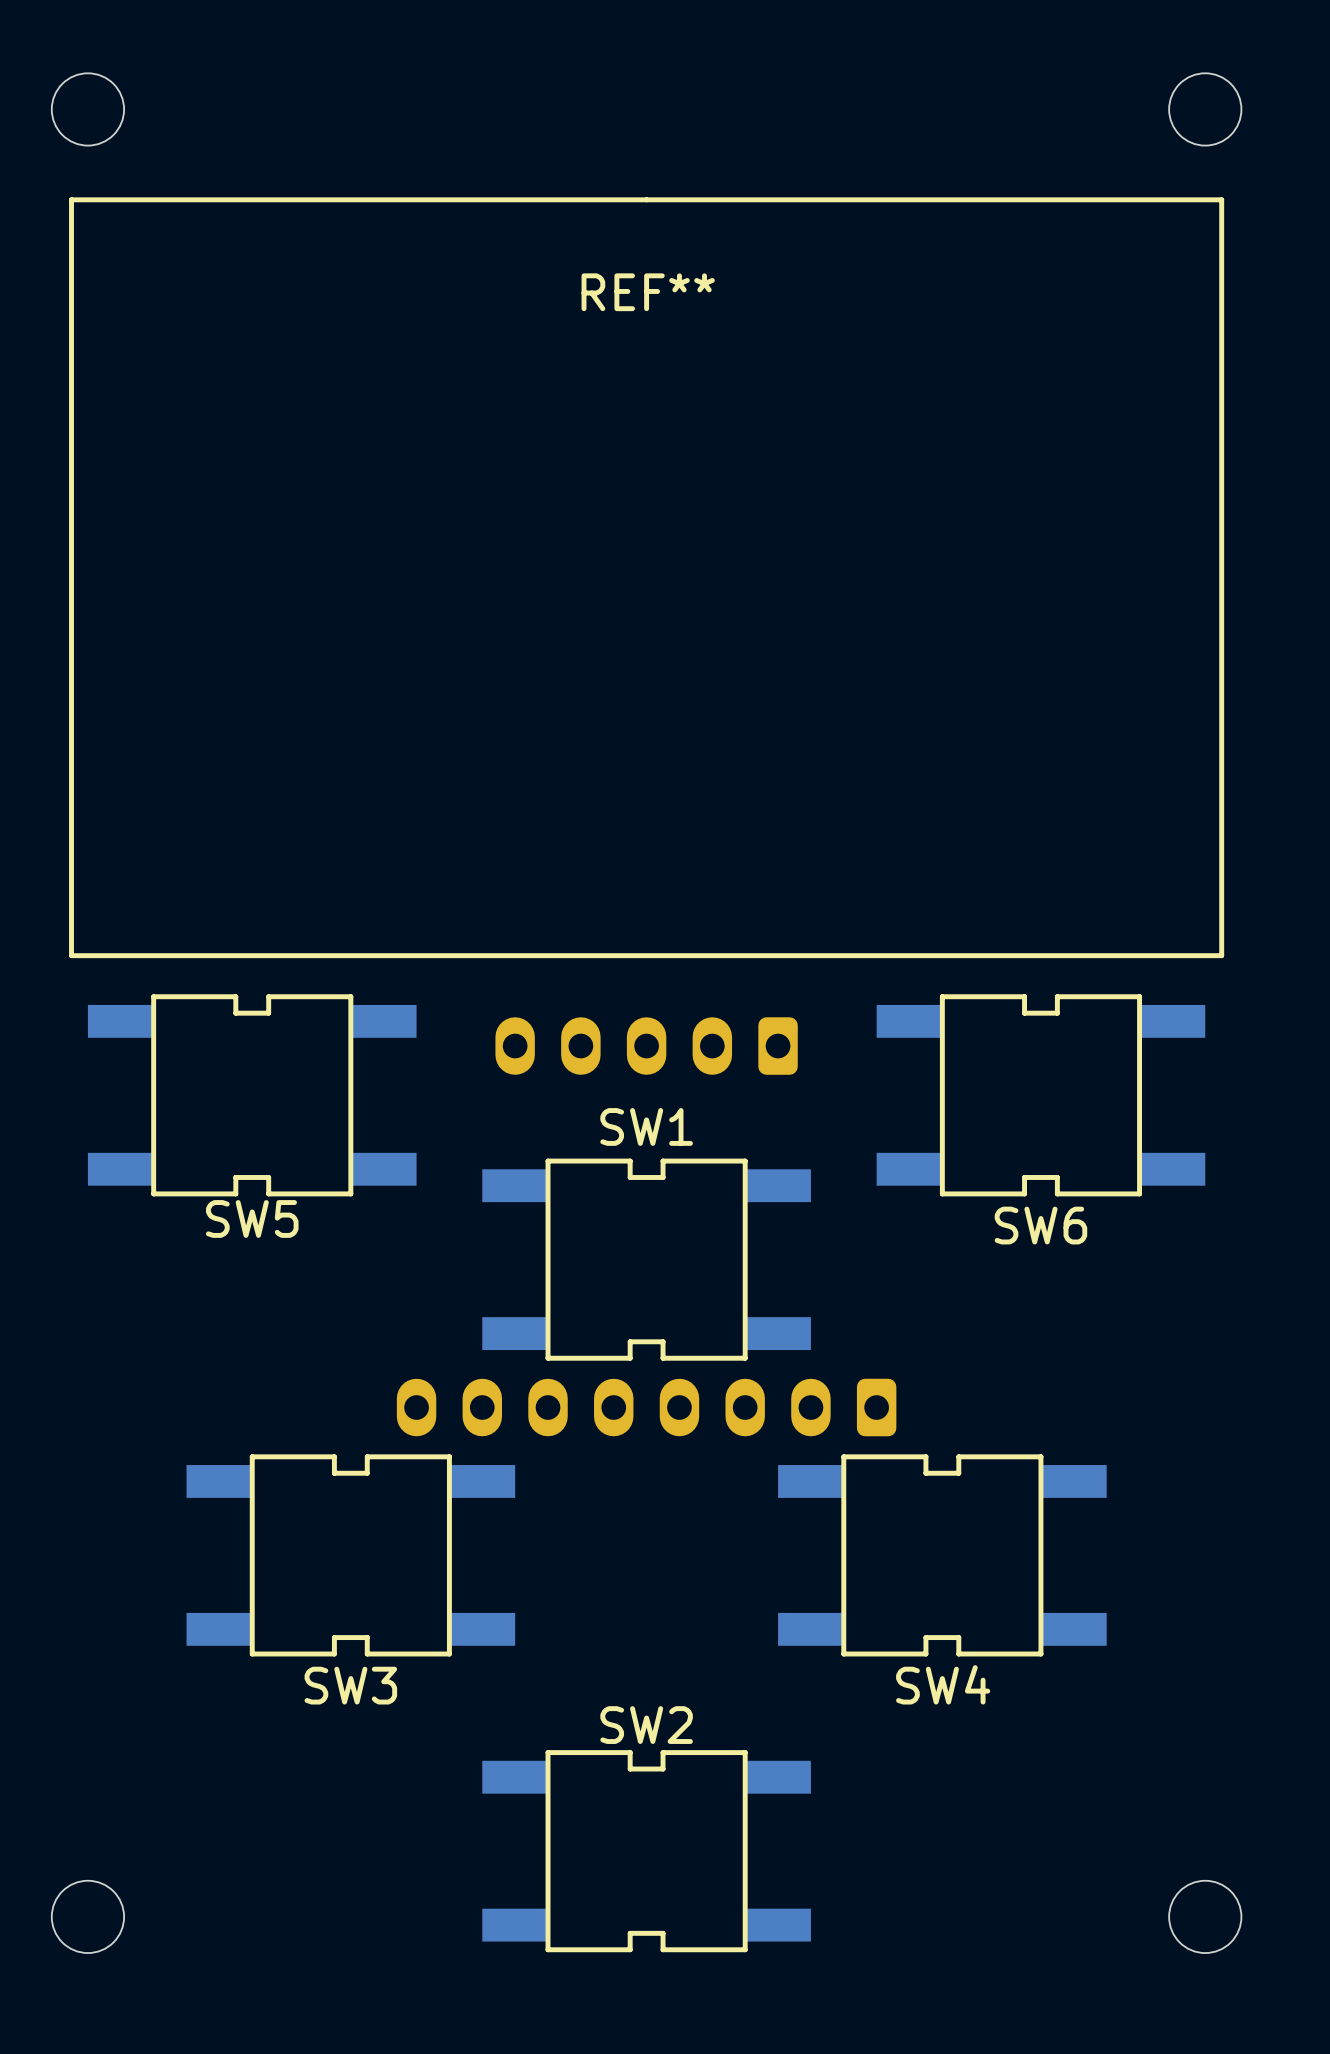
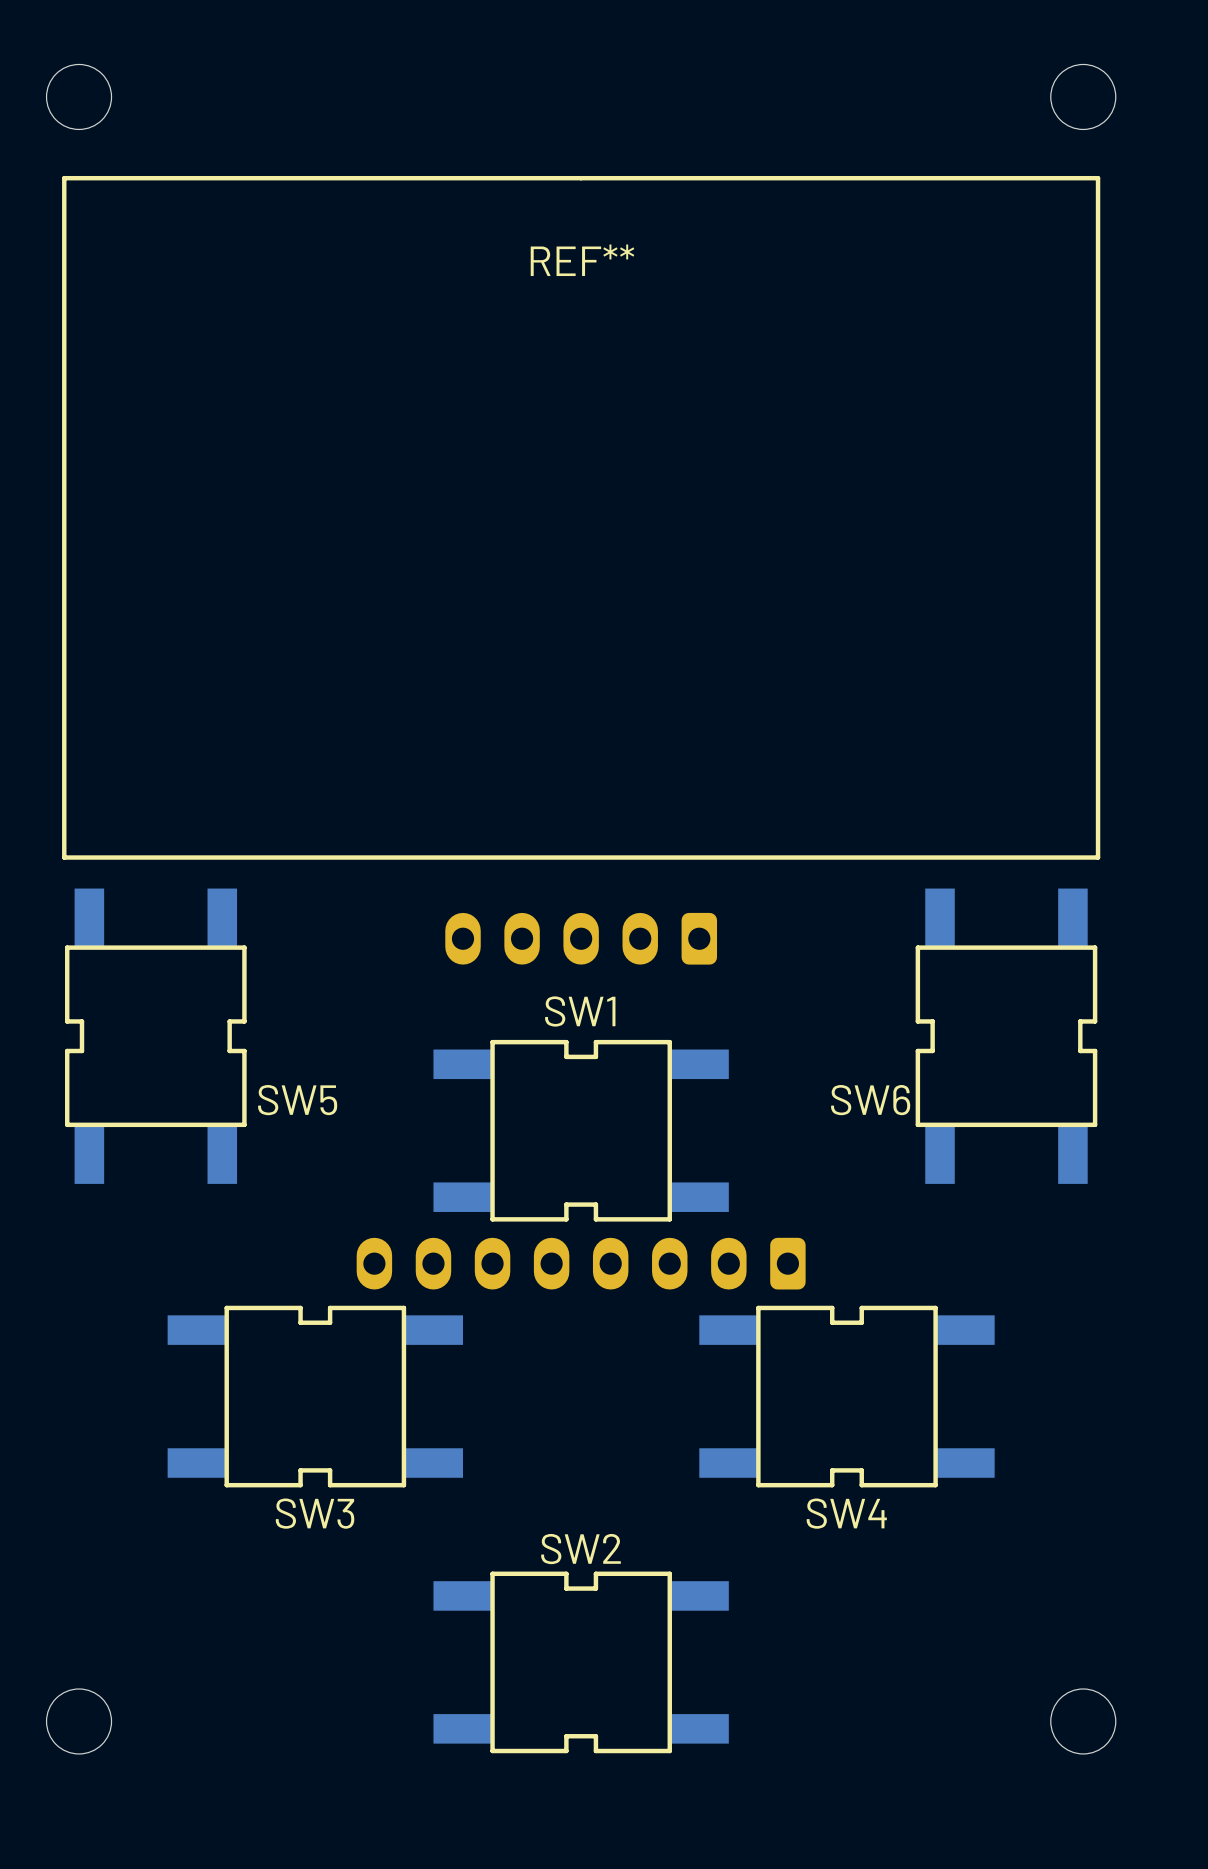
SW5 rotation: 0° (252, 1095) -> 90° clockwise (155, 1036)
SW6 rotation: 0° (1040, 1095) -> 90° clockwise (1006, 1036)
SW5 name position: SW5 (252, 1218) -> SW5 (297, 1100)
SW6 name position: SW6 (1040, 1225) -> SW6 (870, 1100)

